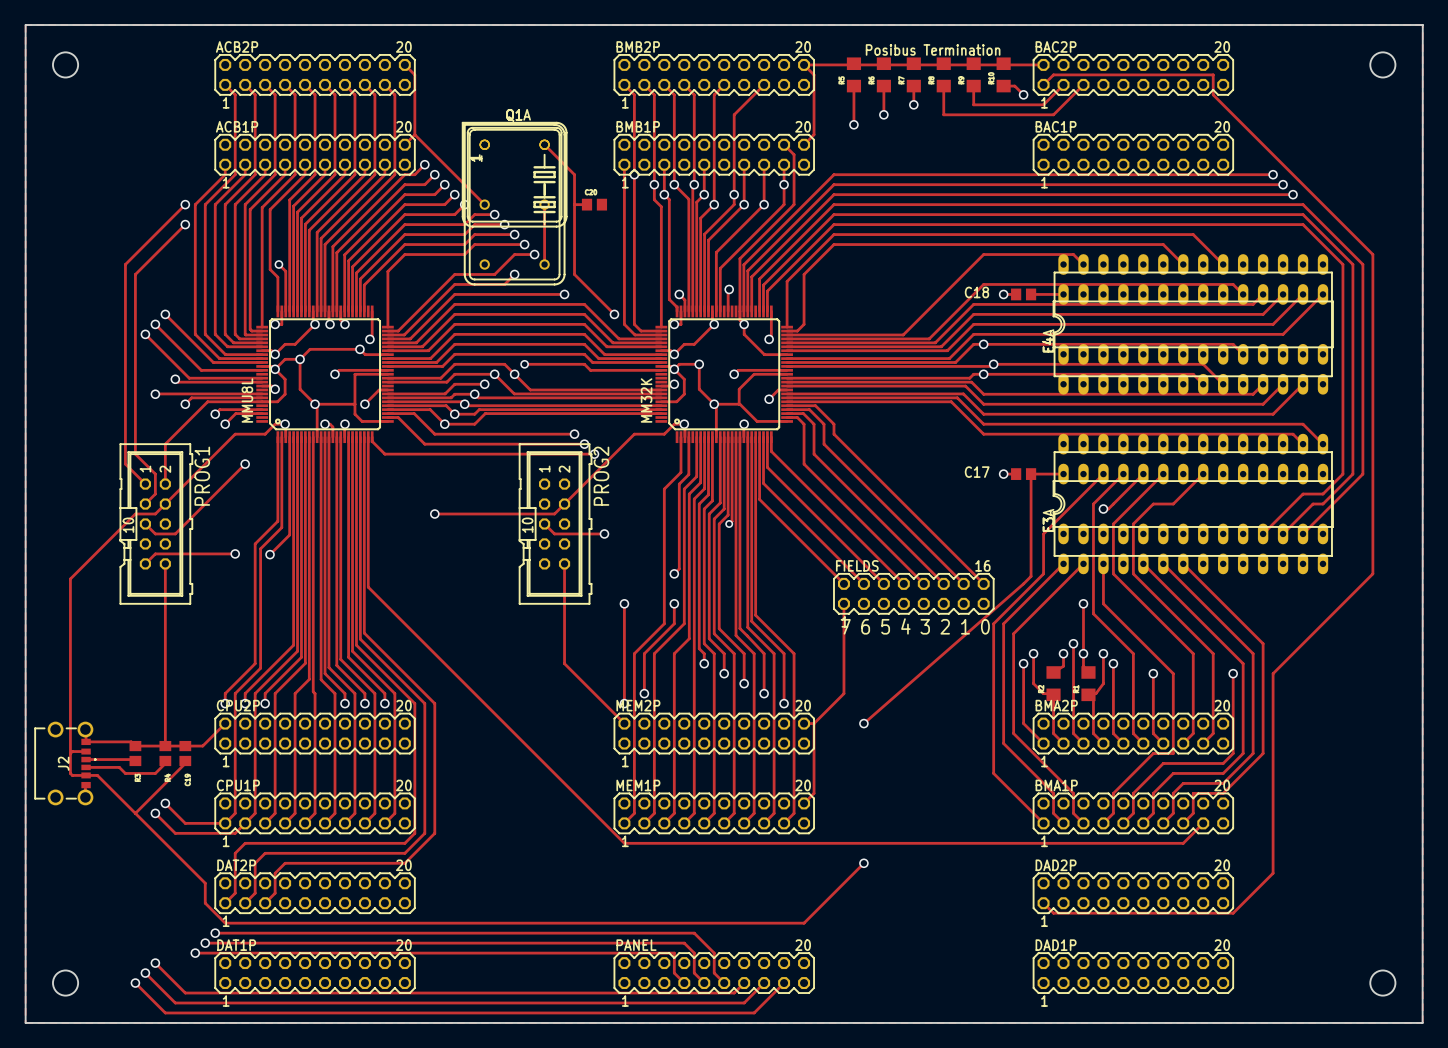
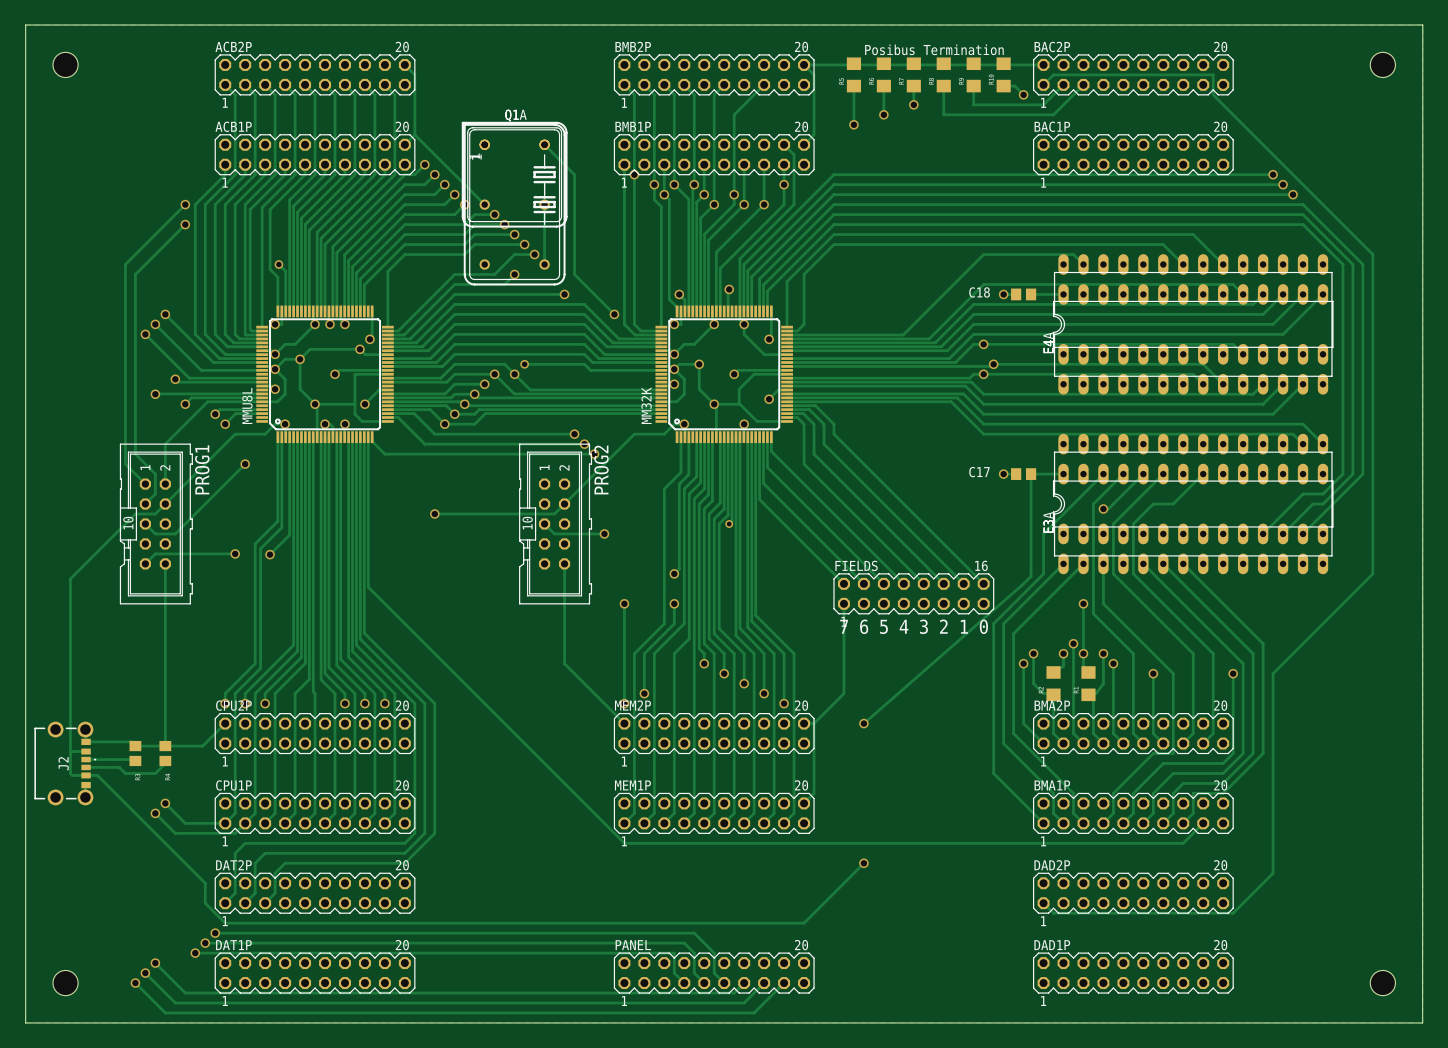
track: (574, 204) (587, 204) -> none
part: (594, 204) -> none
part: (185, 753) -> none
track: (185, 760) (185, 763) (135, 813) -> none

